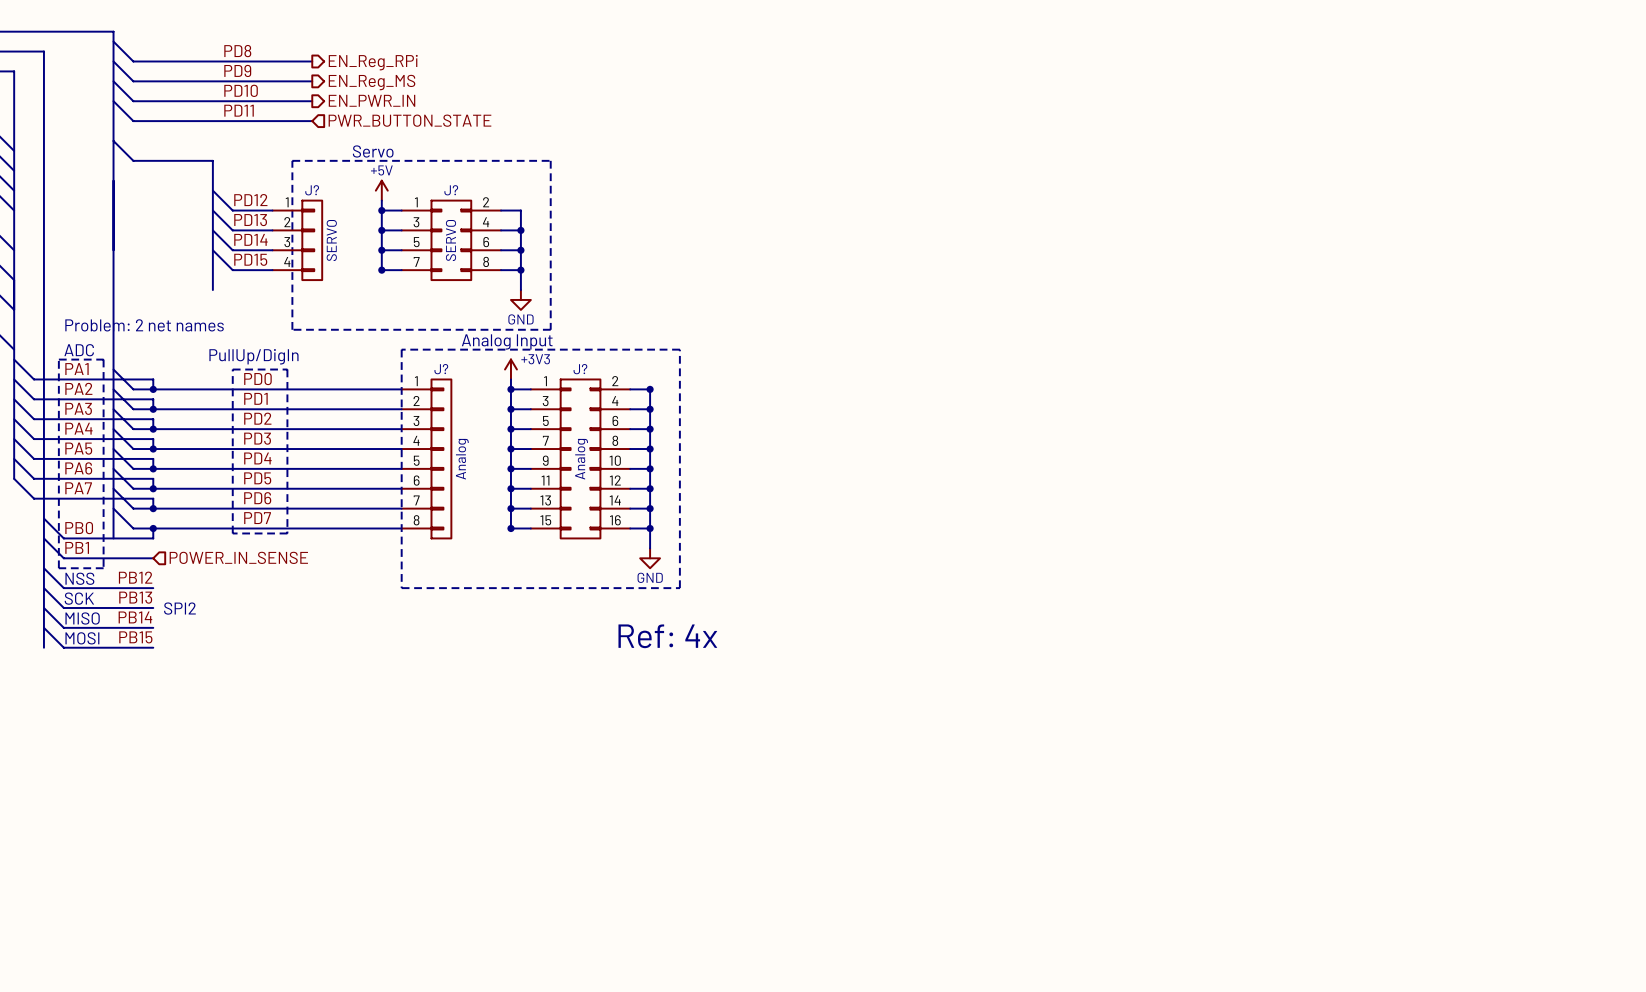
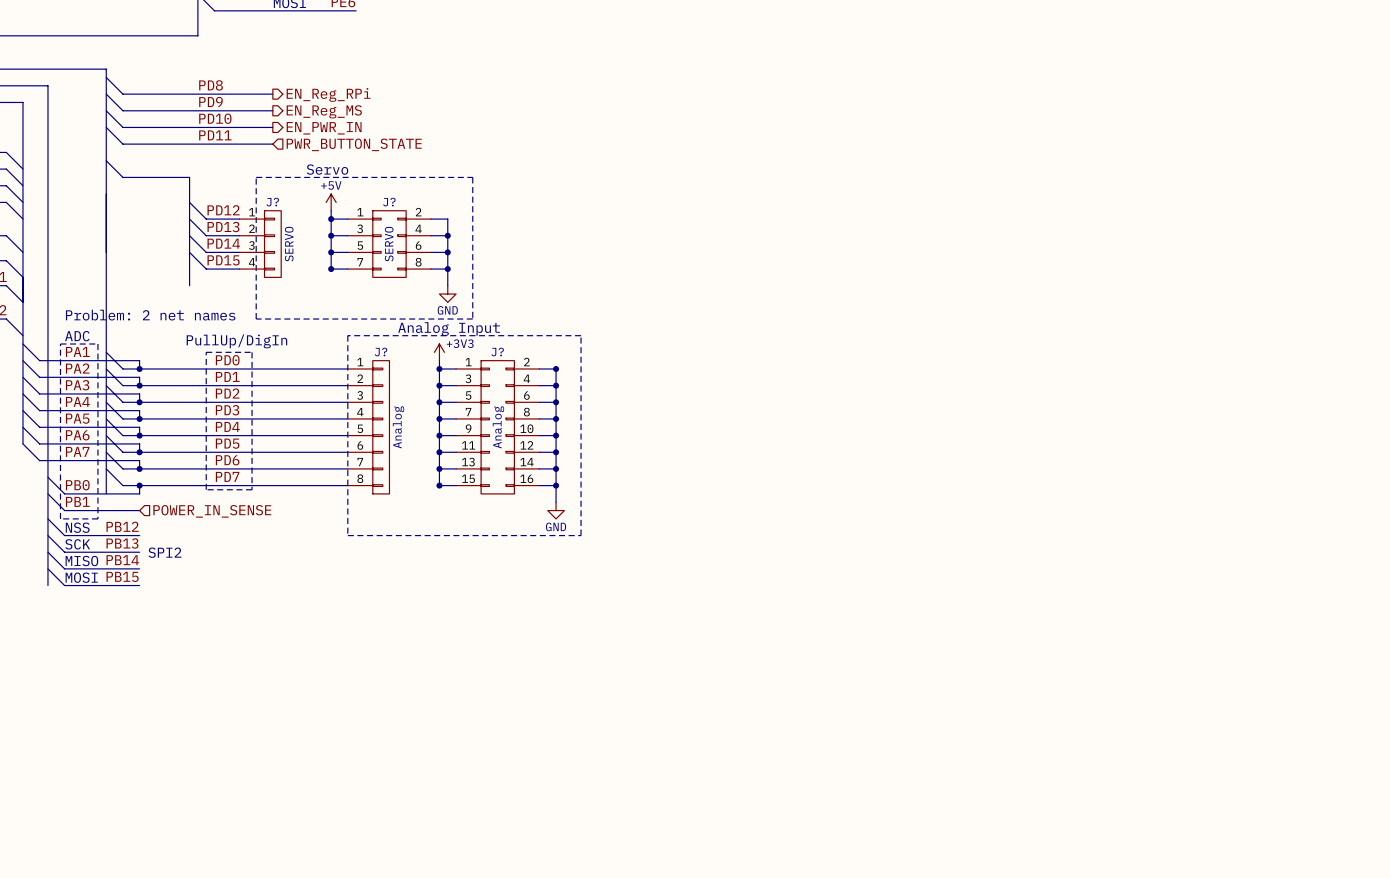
text: Ref: 4x (667, 636) -> none

